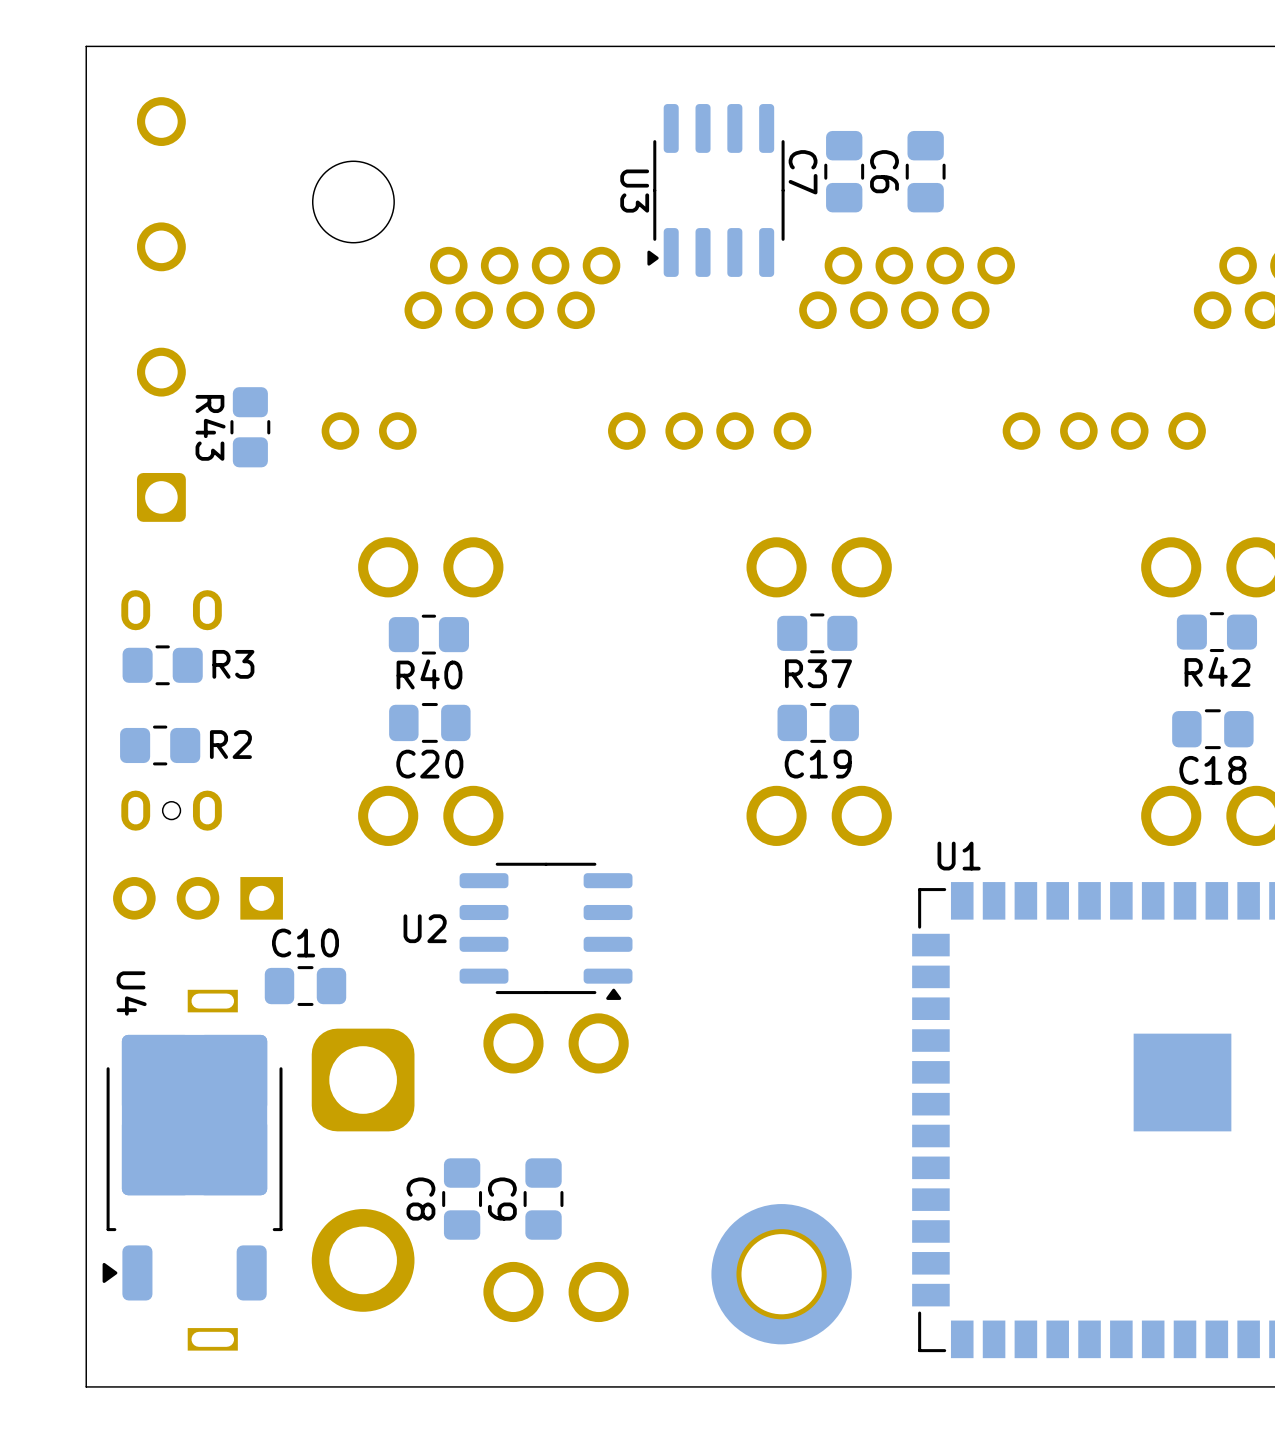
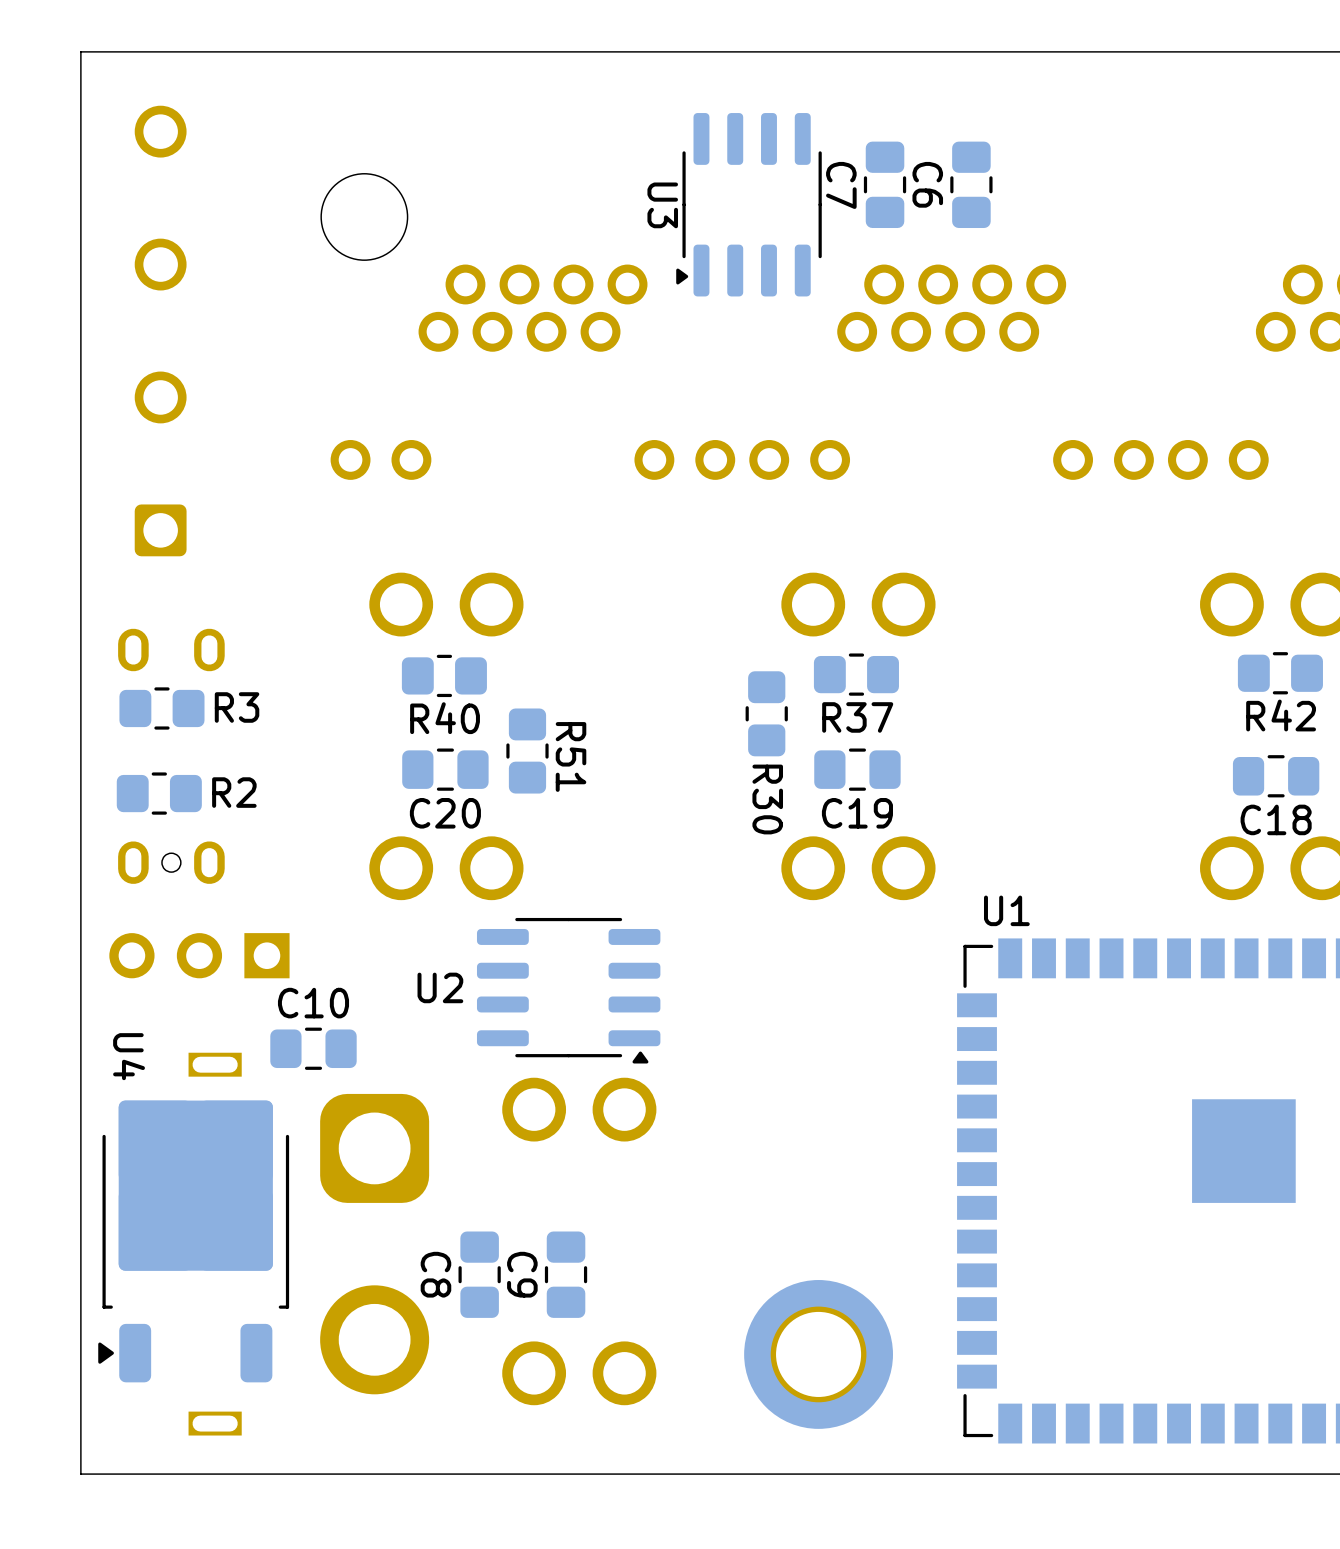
R43: (250, 427) -> none
R30: none -> (766, 713)
R51: none -> (527, 751)

